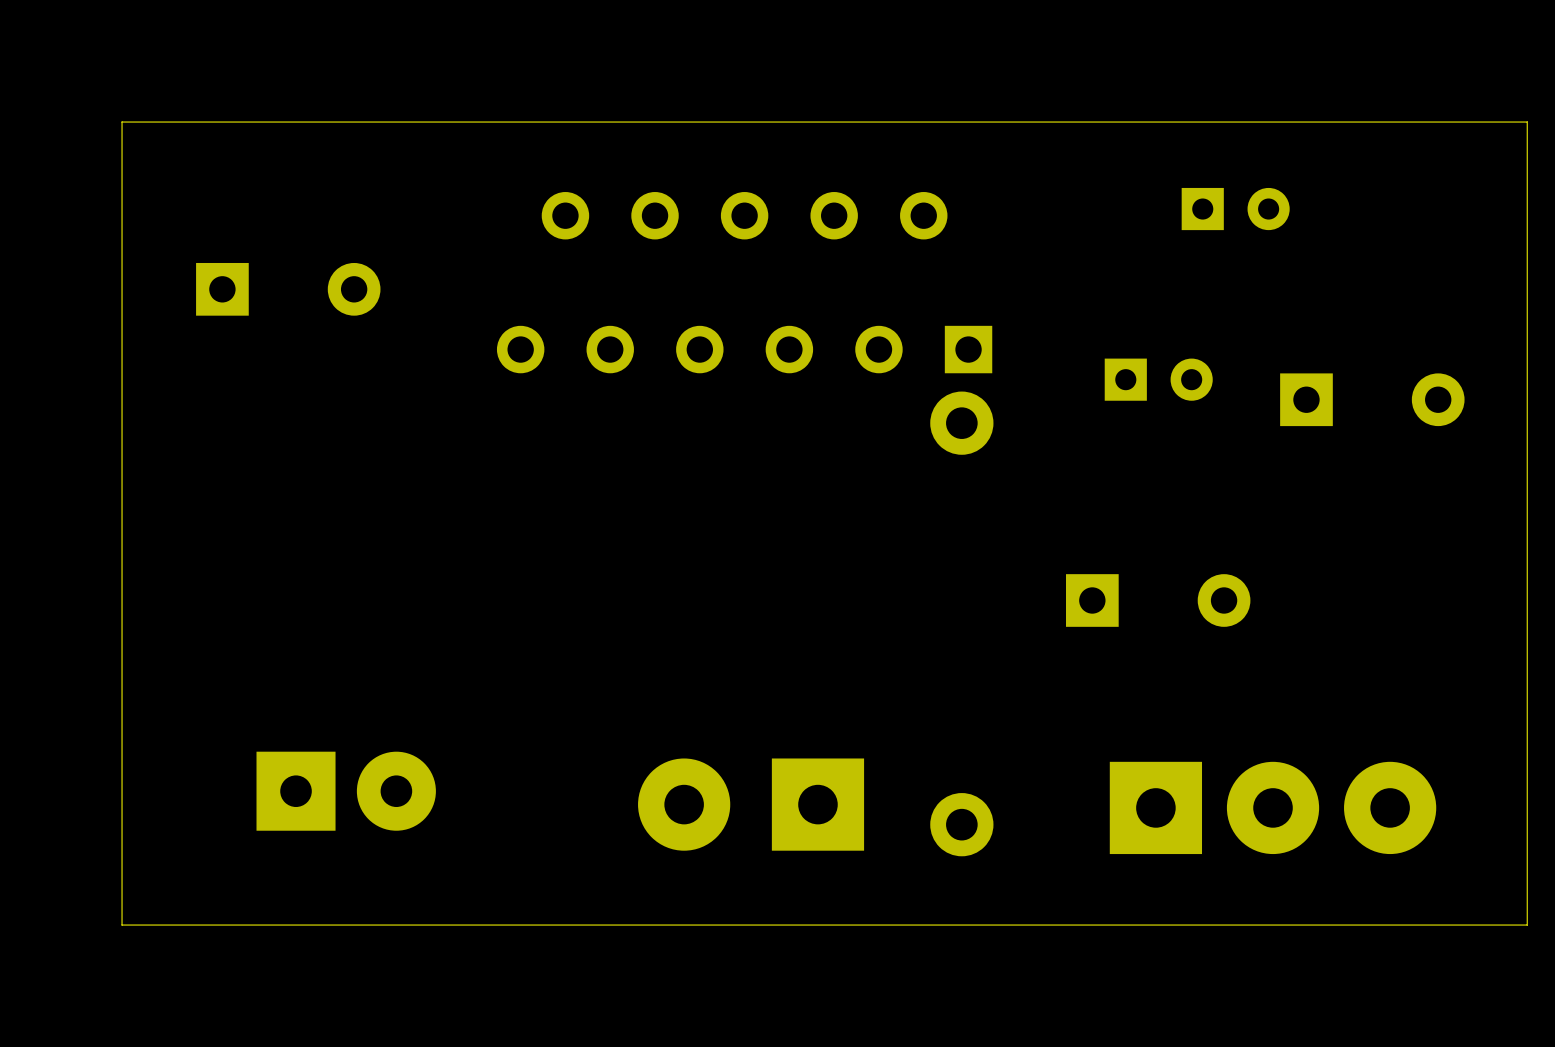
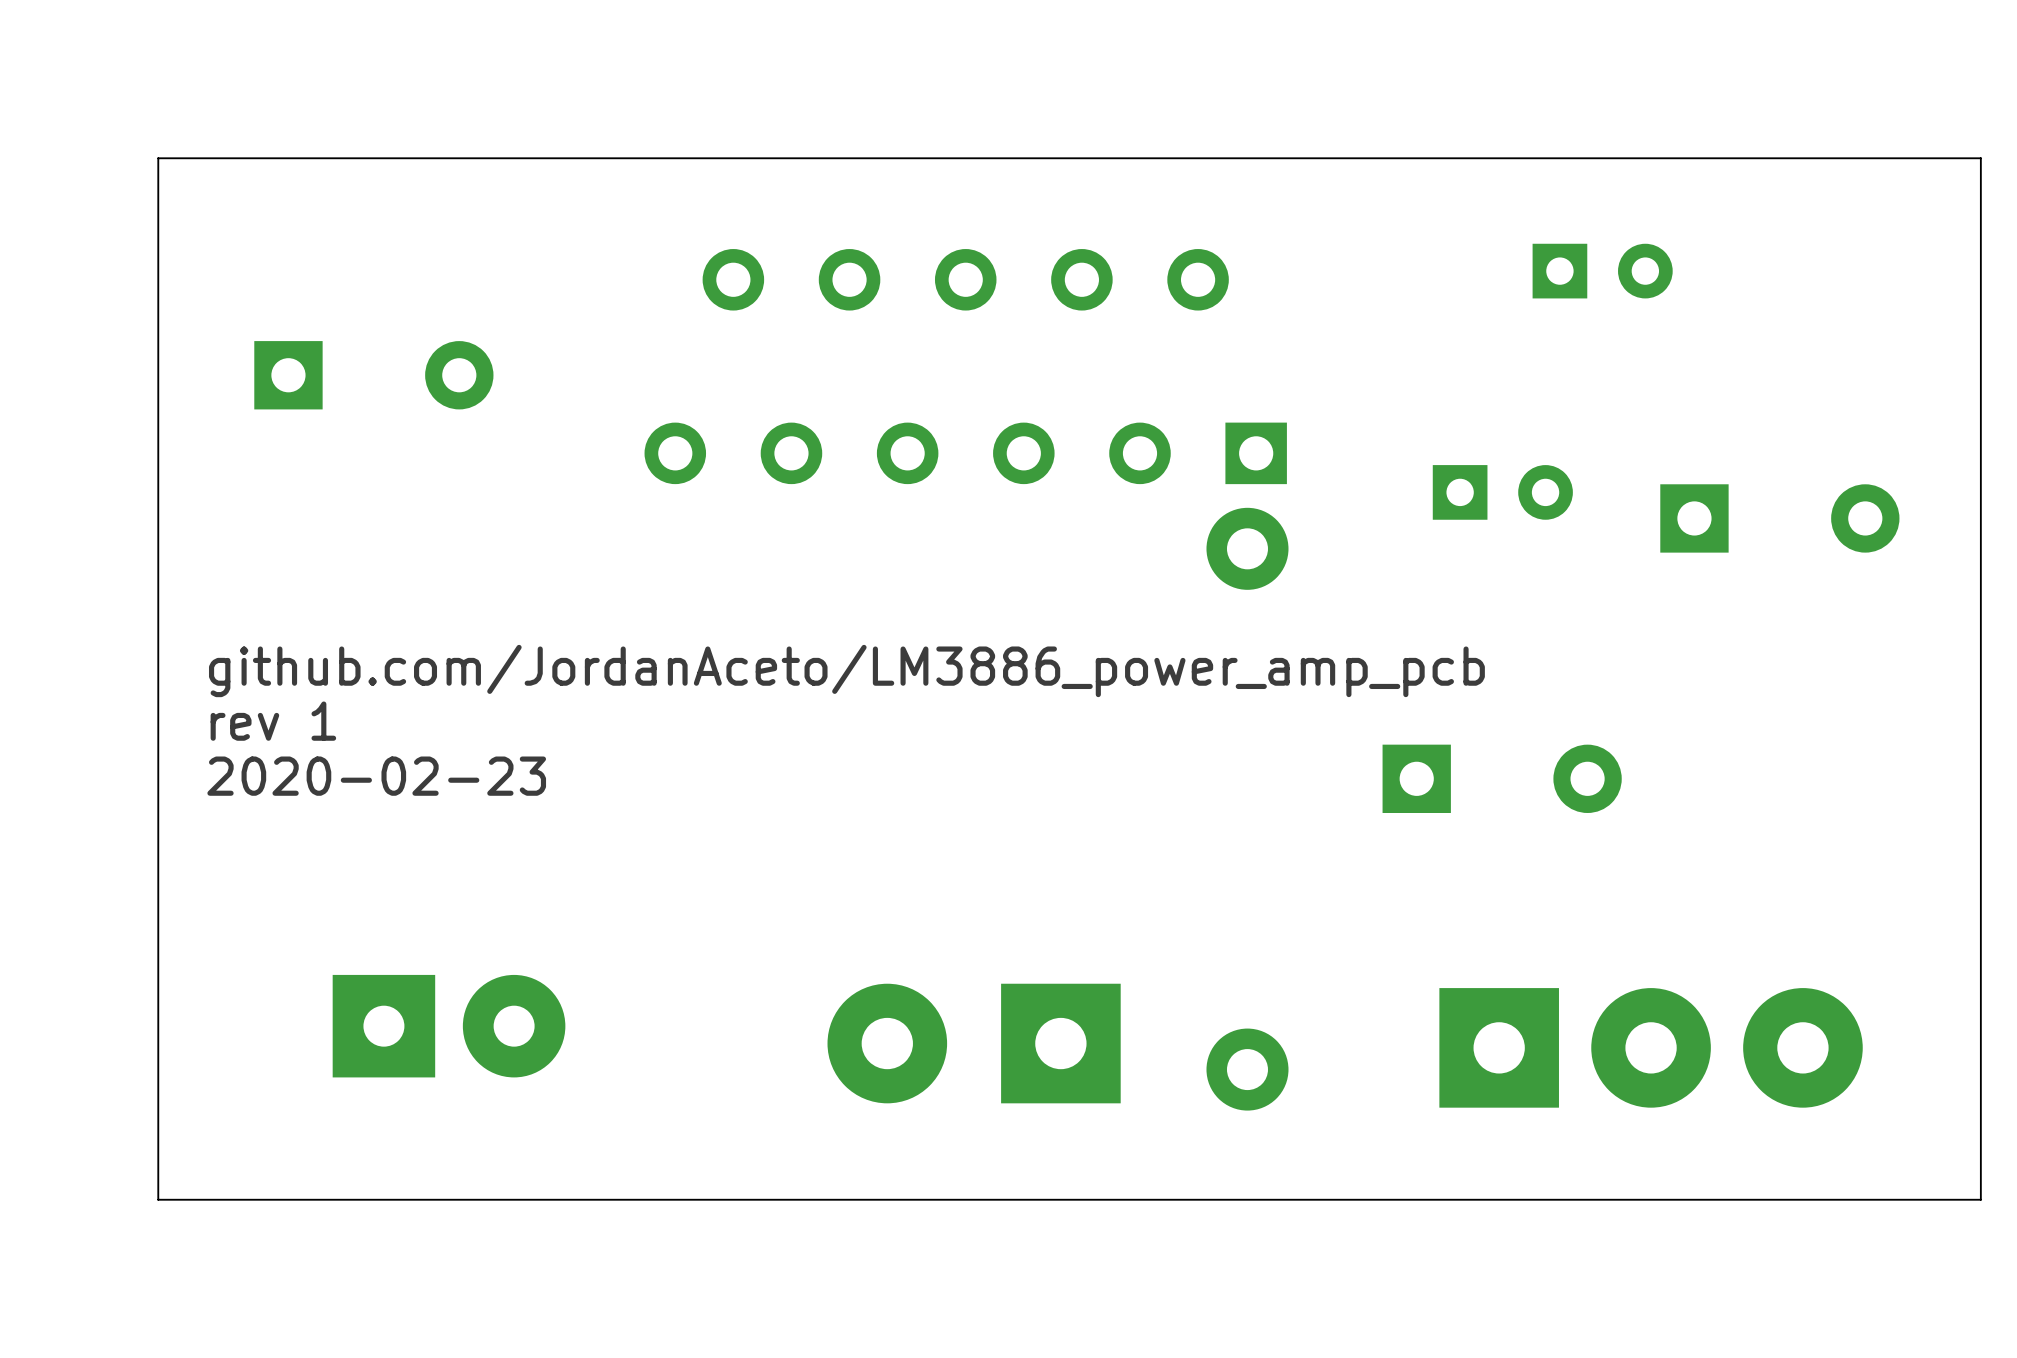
text: none -> github.com/JordanAceto/LM3886_power_amp_pcb (846, 671)
text: none -> rev 1 (273, 721)
text: none -> 2020-02-23 (376, 776)

